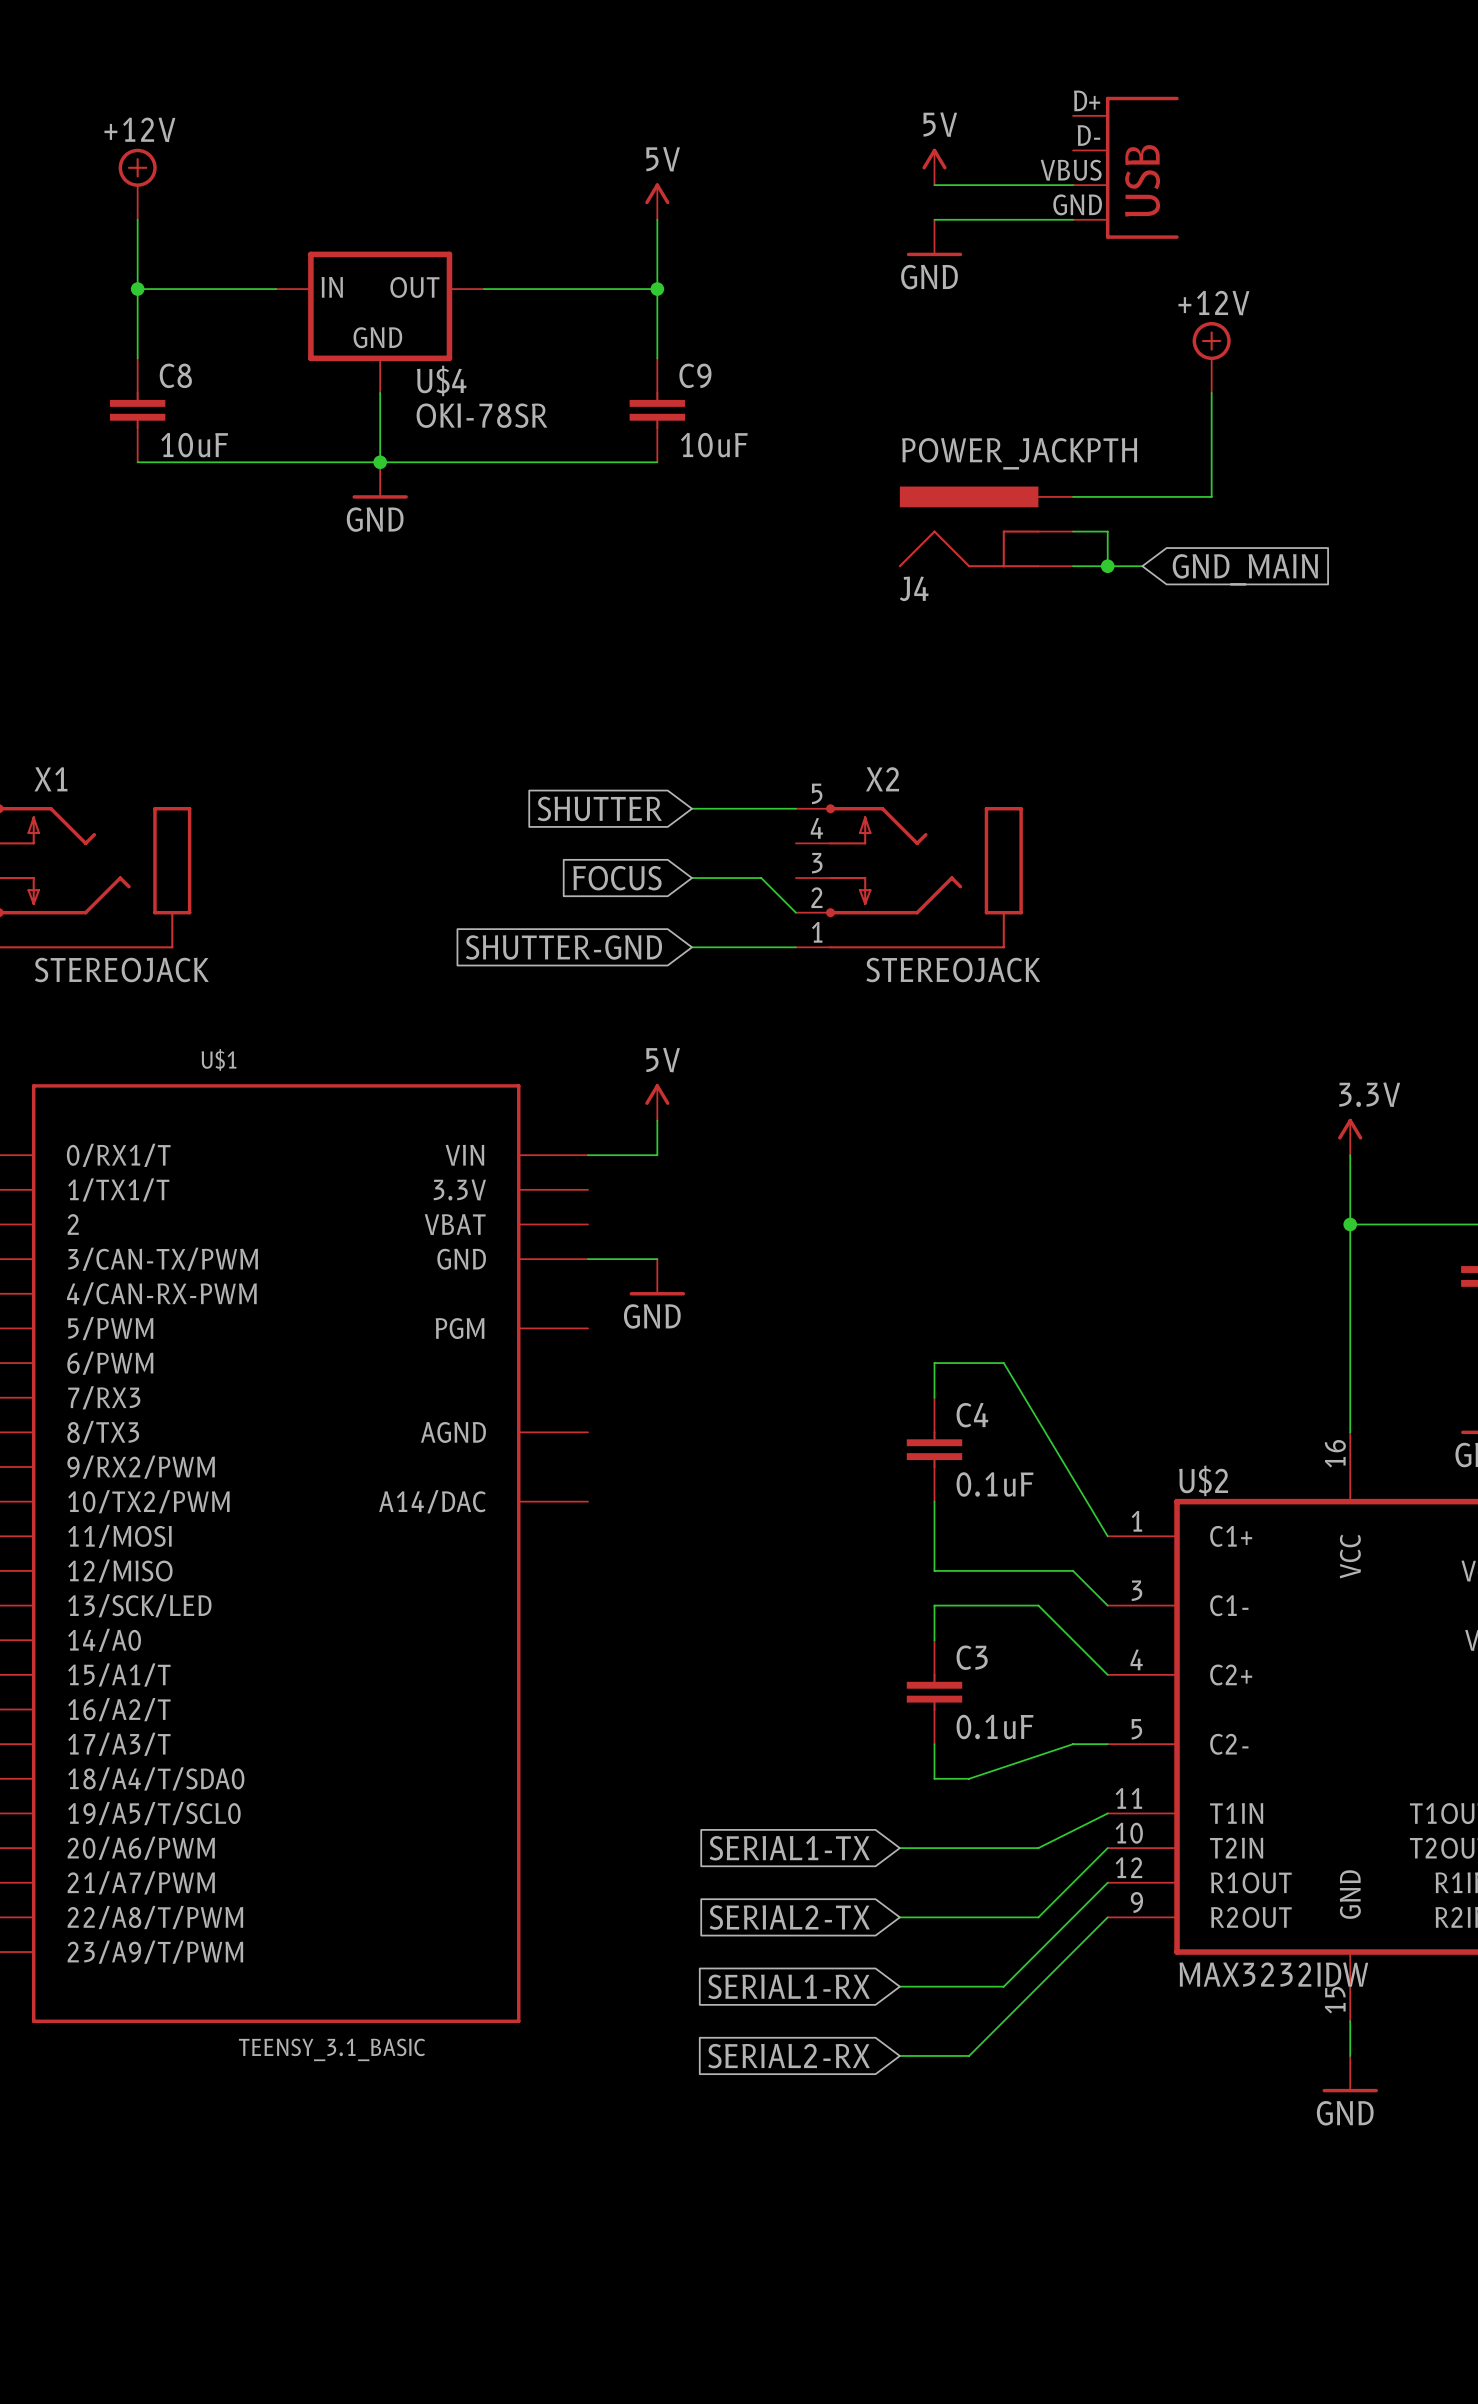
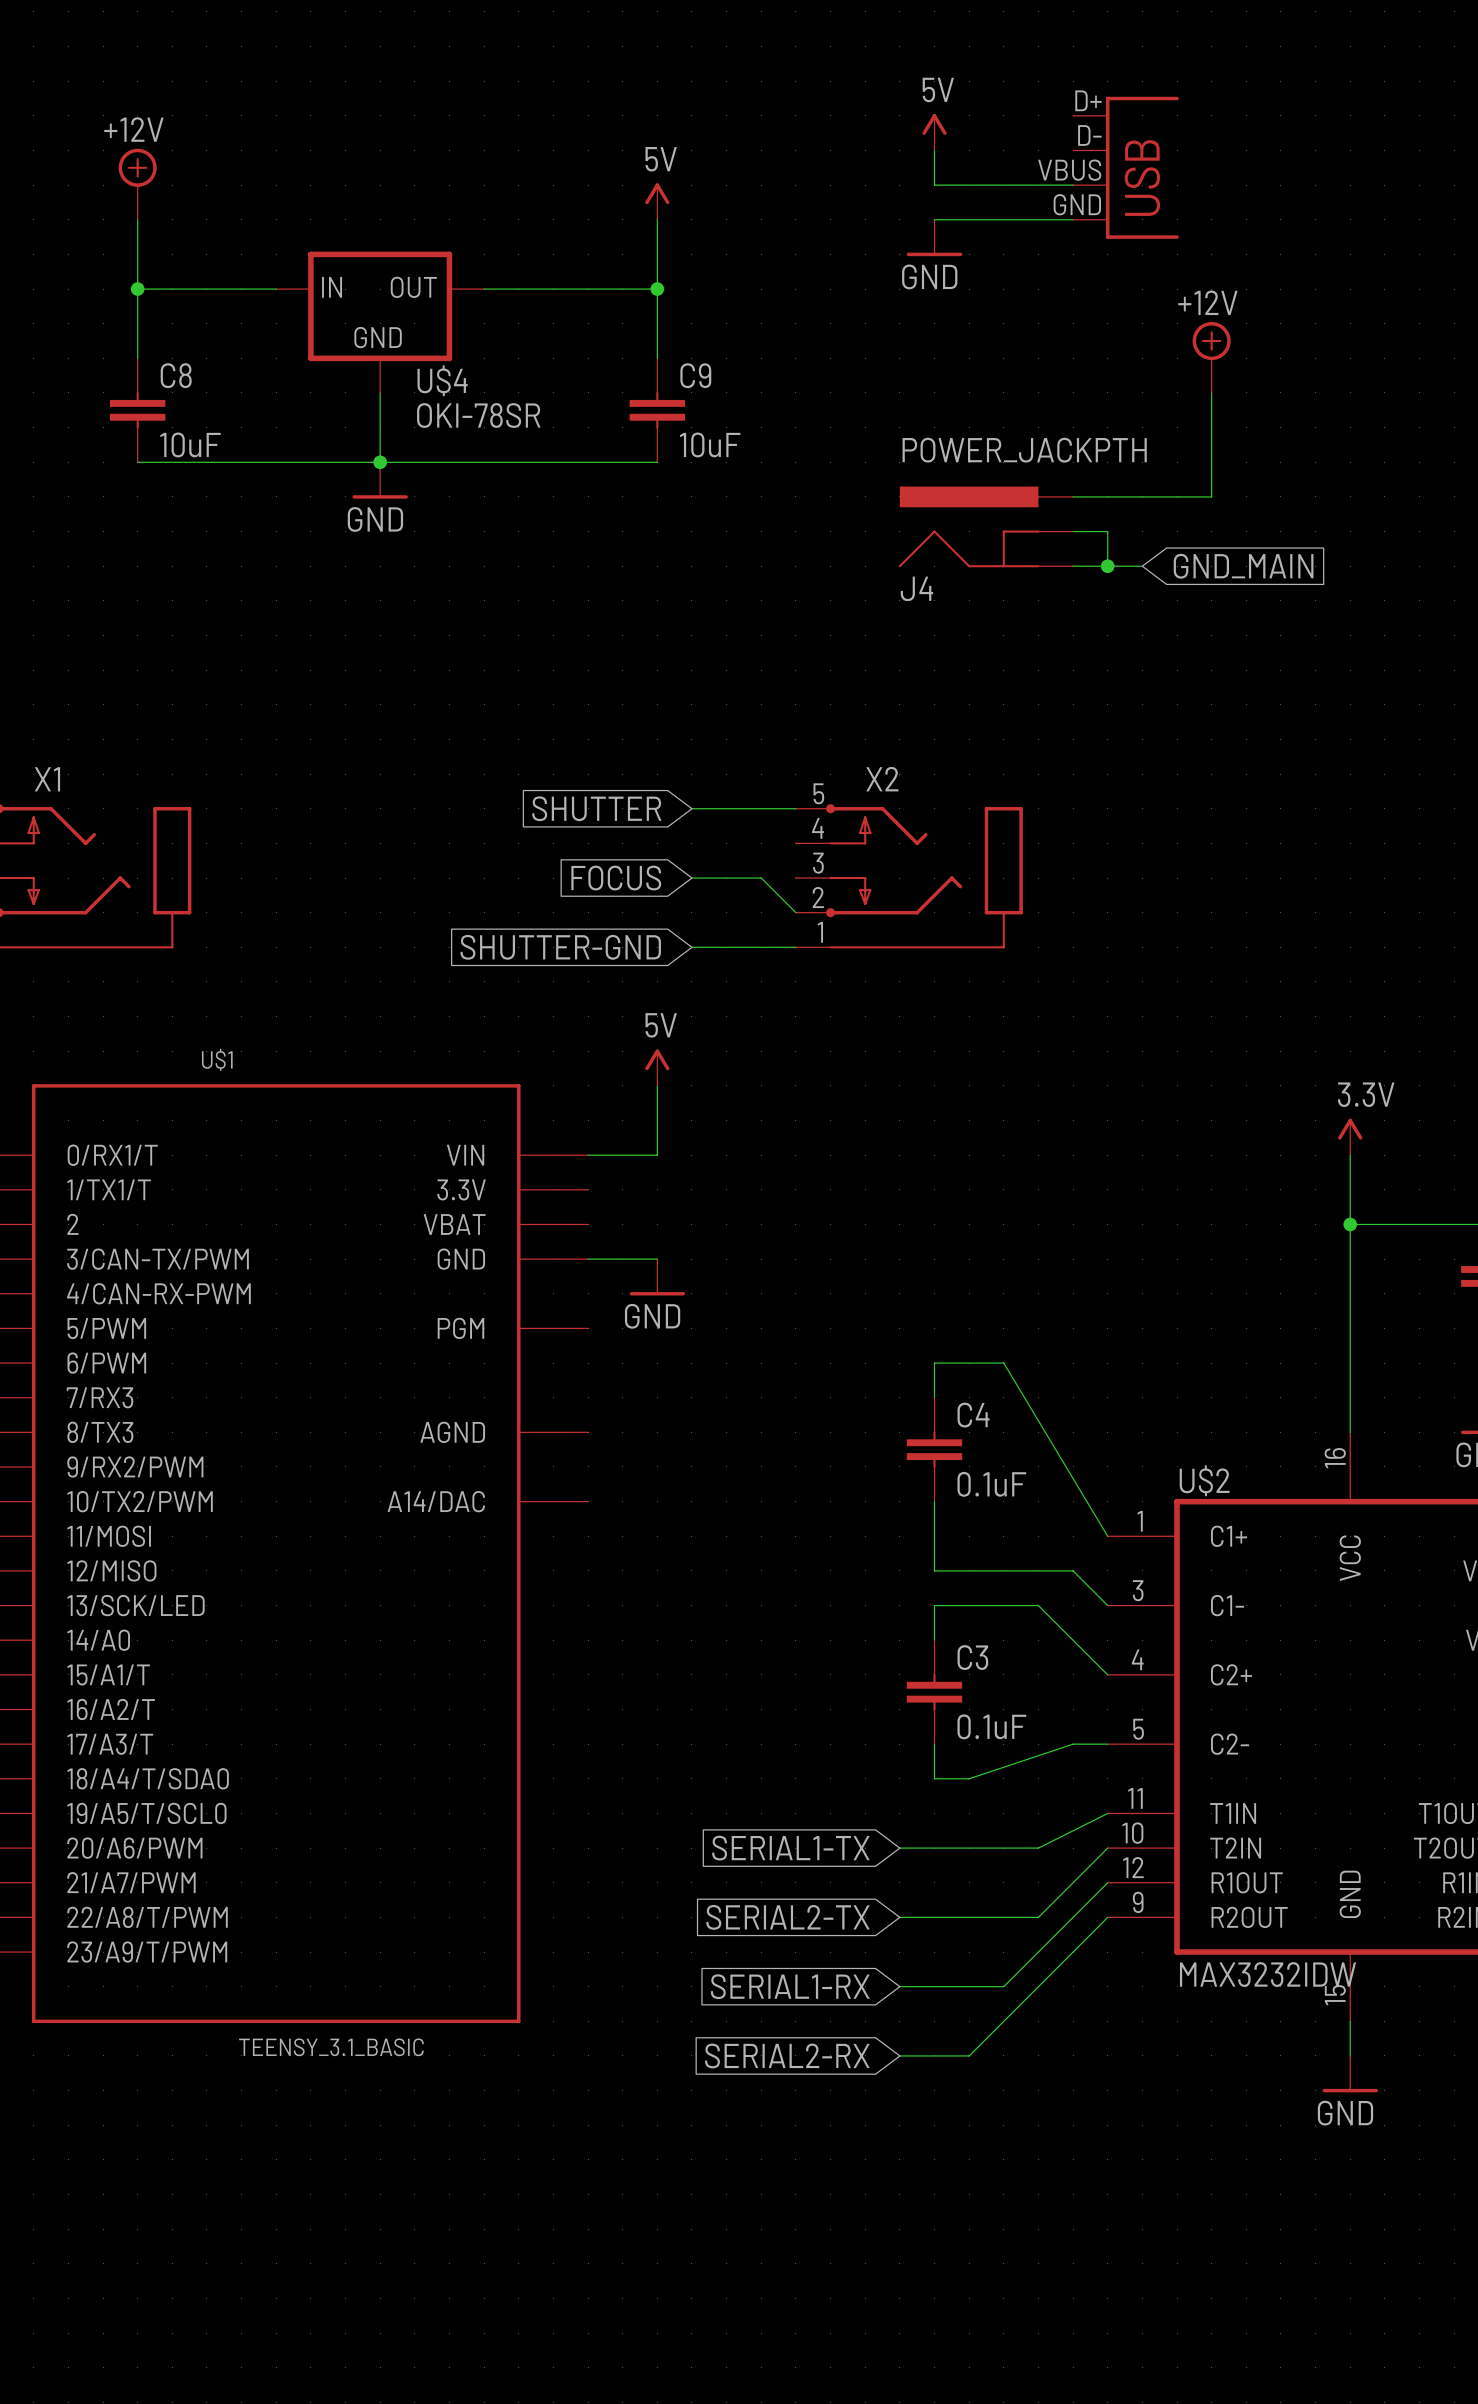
power symbol position: 5V (934, 166) -> 5V (934, 132)
X1 value: STEREOJACK (121, 969) -> none
X2 value: STEREOJACK (953, 969) -> none
power symbol position: 5V (657, 1102) -> 5V (657, 1067)

